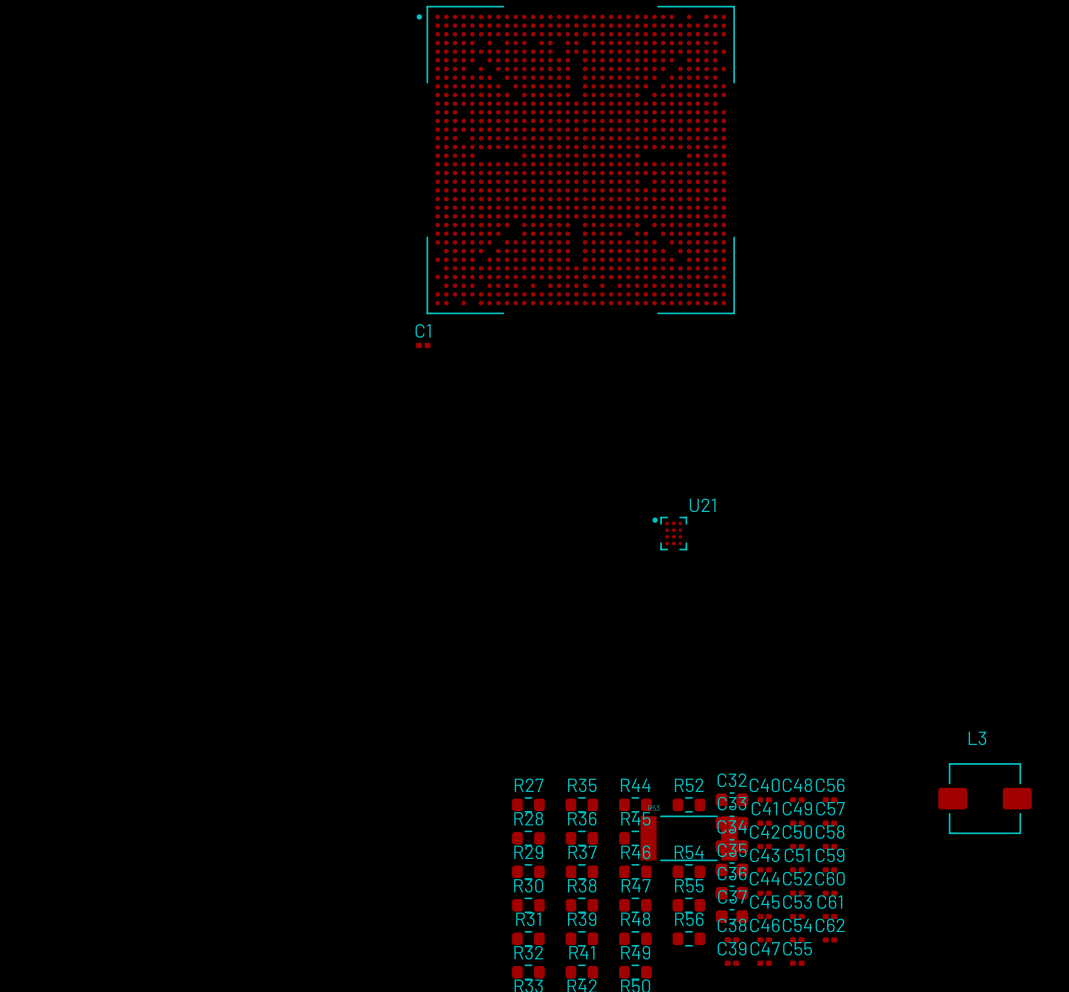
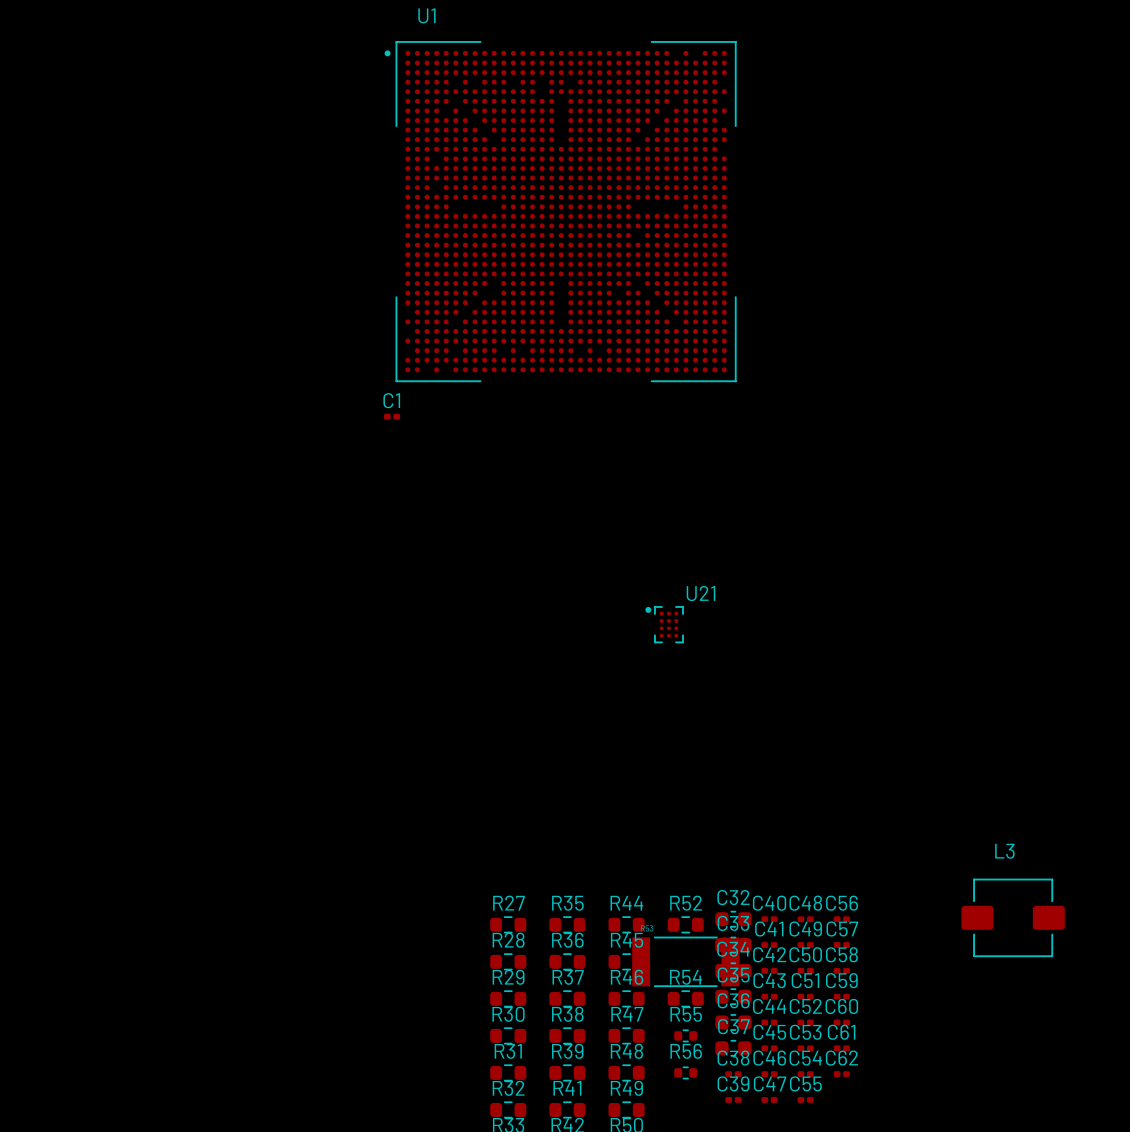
R55 footprint: [672, 897, 706, 914] -> [674, 1029, 698, 1043]
R56 footprint: [672, 931, 706, 947] -> [674, 1066, 698, 1080]

